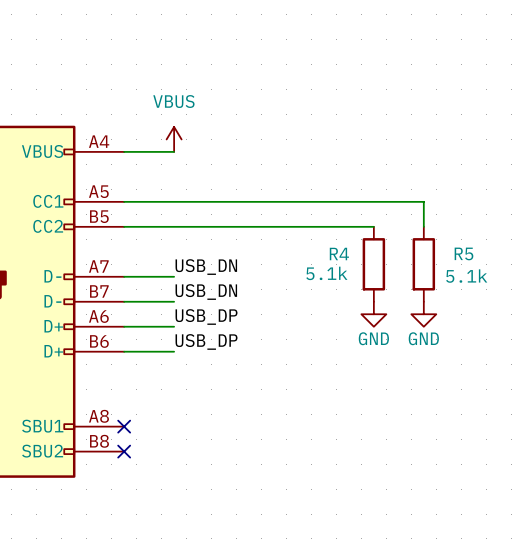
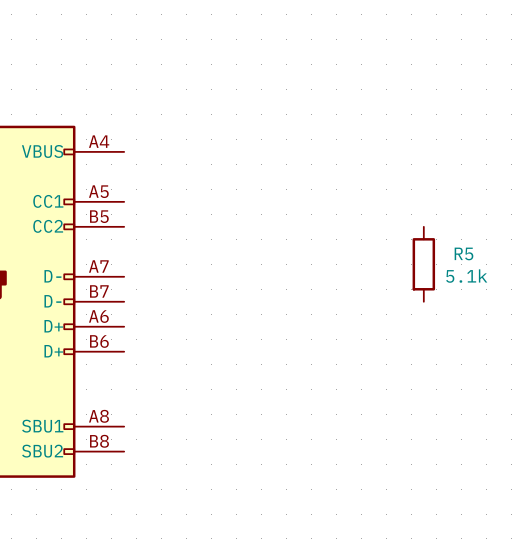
power symbol: VBUS (174, 139) -> none
wire: (124, 151) (174, 151) -> none
wire: (124, 201) (423, 201) (423, 226) -> none
wire: (124, 226) (373, 226) -> none
R4: 5.1k (373, 264) -> none
label: USB_DN (206, 267) -> none
wire: (124, 276) (174, 276) -> none
label: USB_DN (206, 292) -> none
wire: (124, 301) (174, 301) -> none
power symbol: GND (373, 314) -> none
power symbol: GND (423, 314) -> none
label: USB_DP (206, 316) -> none
wire: (124, 326) (174, 326) -> none
label: USB_DP (206, 341) -> none
wire: (124, 351) (174, 351) -> none
no-connect mark: (124, 426) -> none
no-connect mark: (124, 451) -> none

